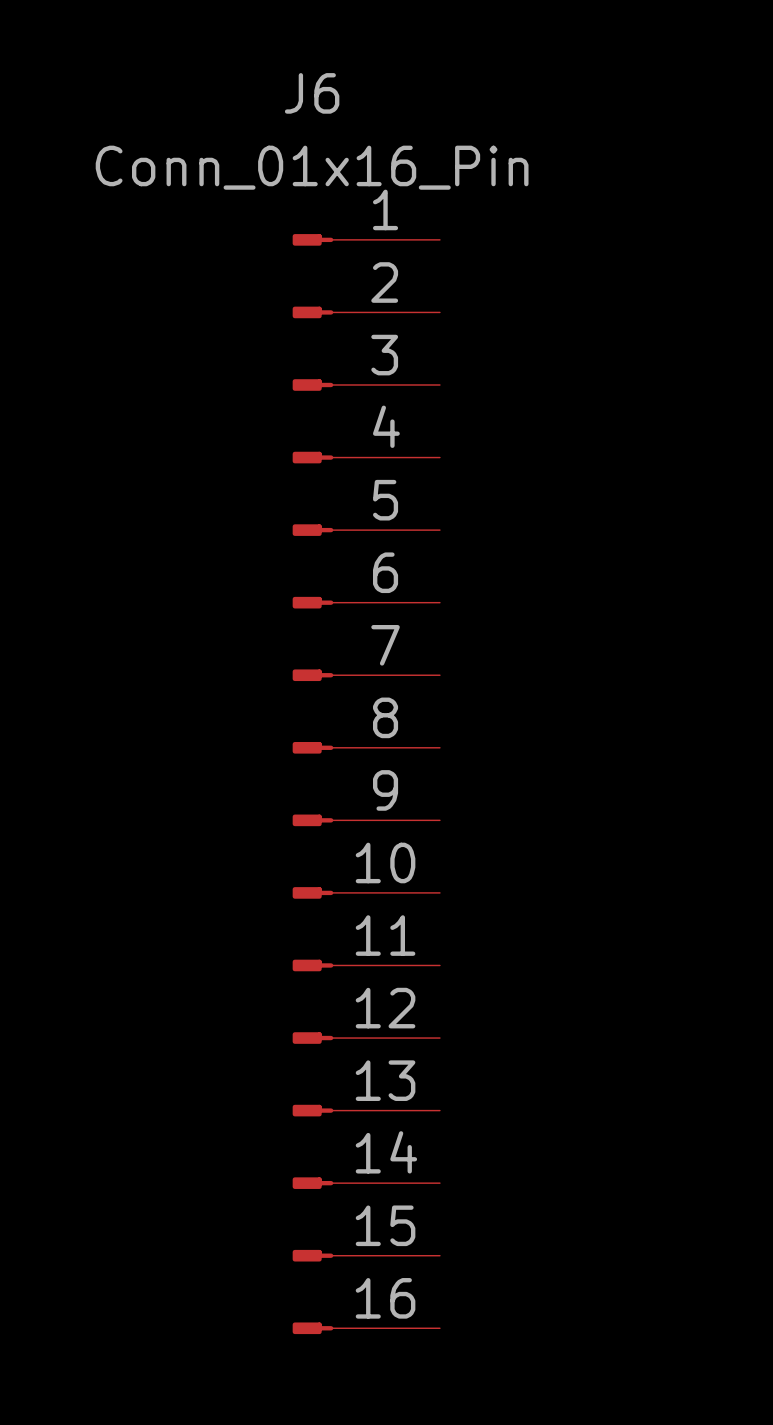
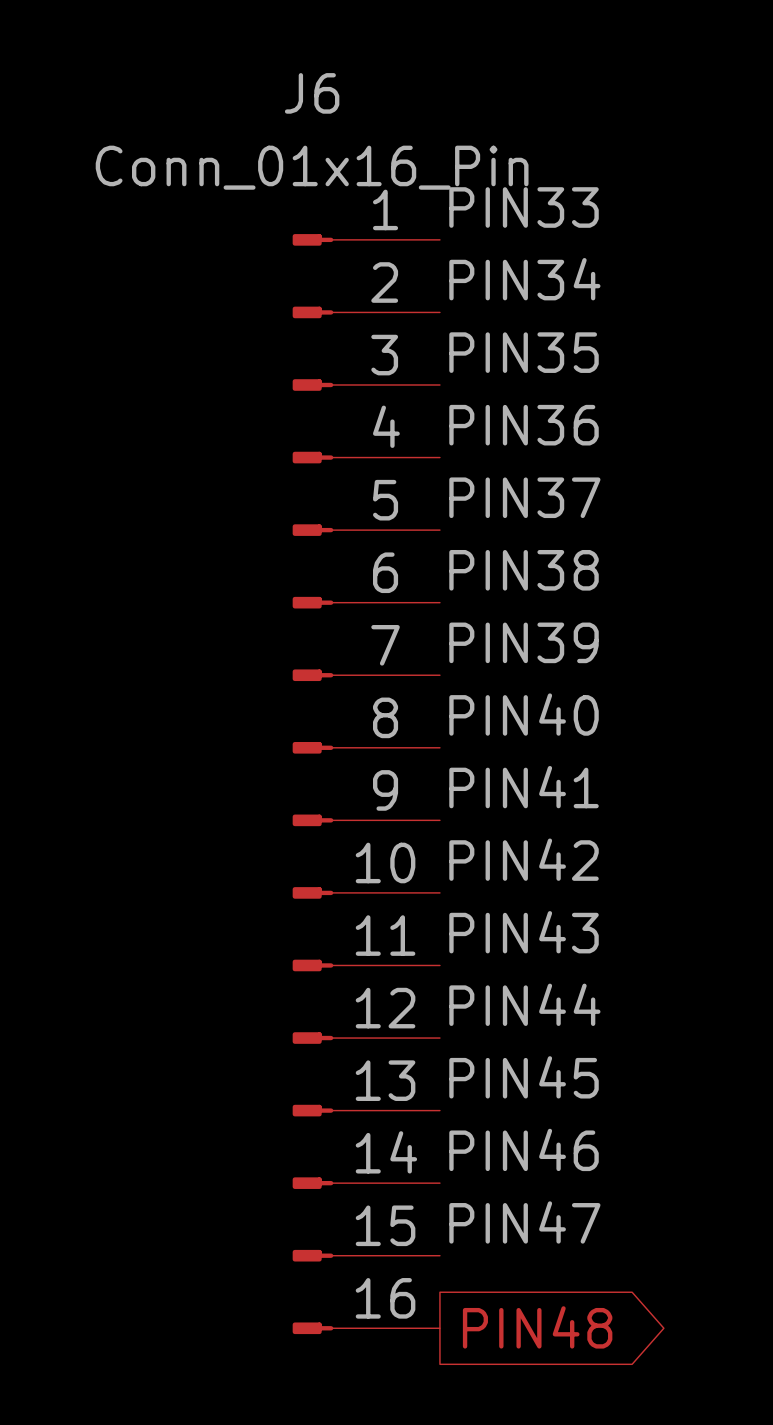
label: none -> PIN33 (524, 207)
label: none -> PIN34 (524, 279)
label: none -> PIN35 (524, 352)
label: none -> PIN36 (524, 425)
label: none -> PIN37 (524, 497)
label: none -> PIN38 (524, 570)
label: none -> PIN39 (524, 642)
label: none -> PIN40 (524, 714)
label: none -> PIN41 (524, 787)
label: none -> PIN42 (524, 859)
label: none -> PIN43 (524, 932)
label: none -> PIN44 (524, 1004)
label: none -> PIN45 (524, 1077)
label: none -> PIN46 (524, 1149)
label: none -> PIN47 (524, 1222)
global label: none -> PIN48 (537, 1327)

